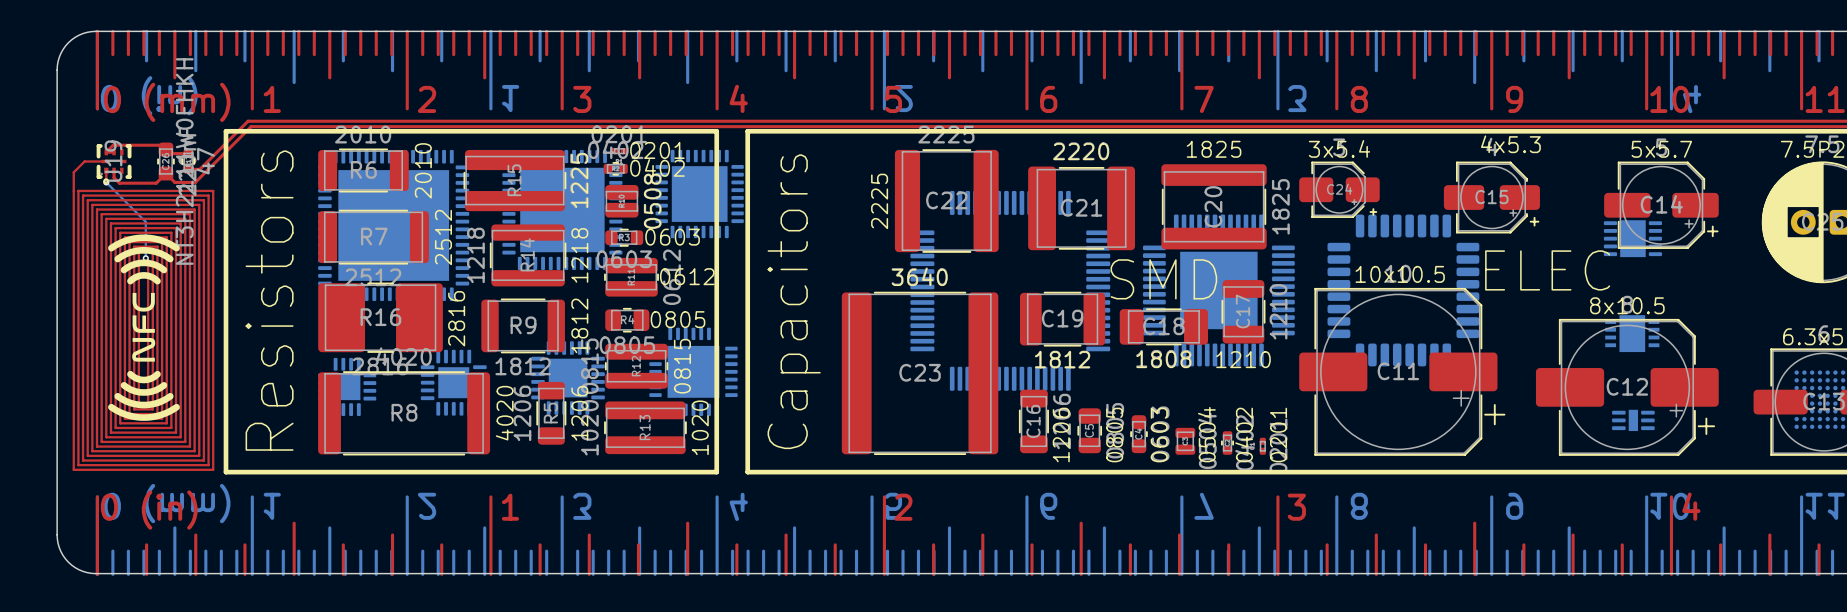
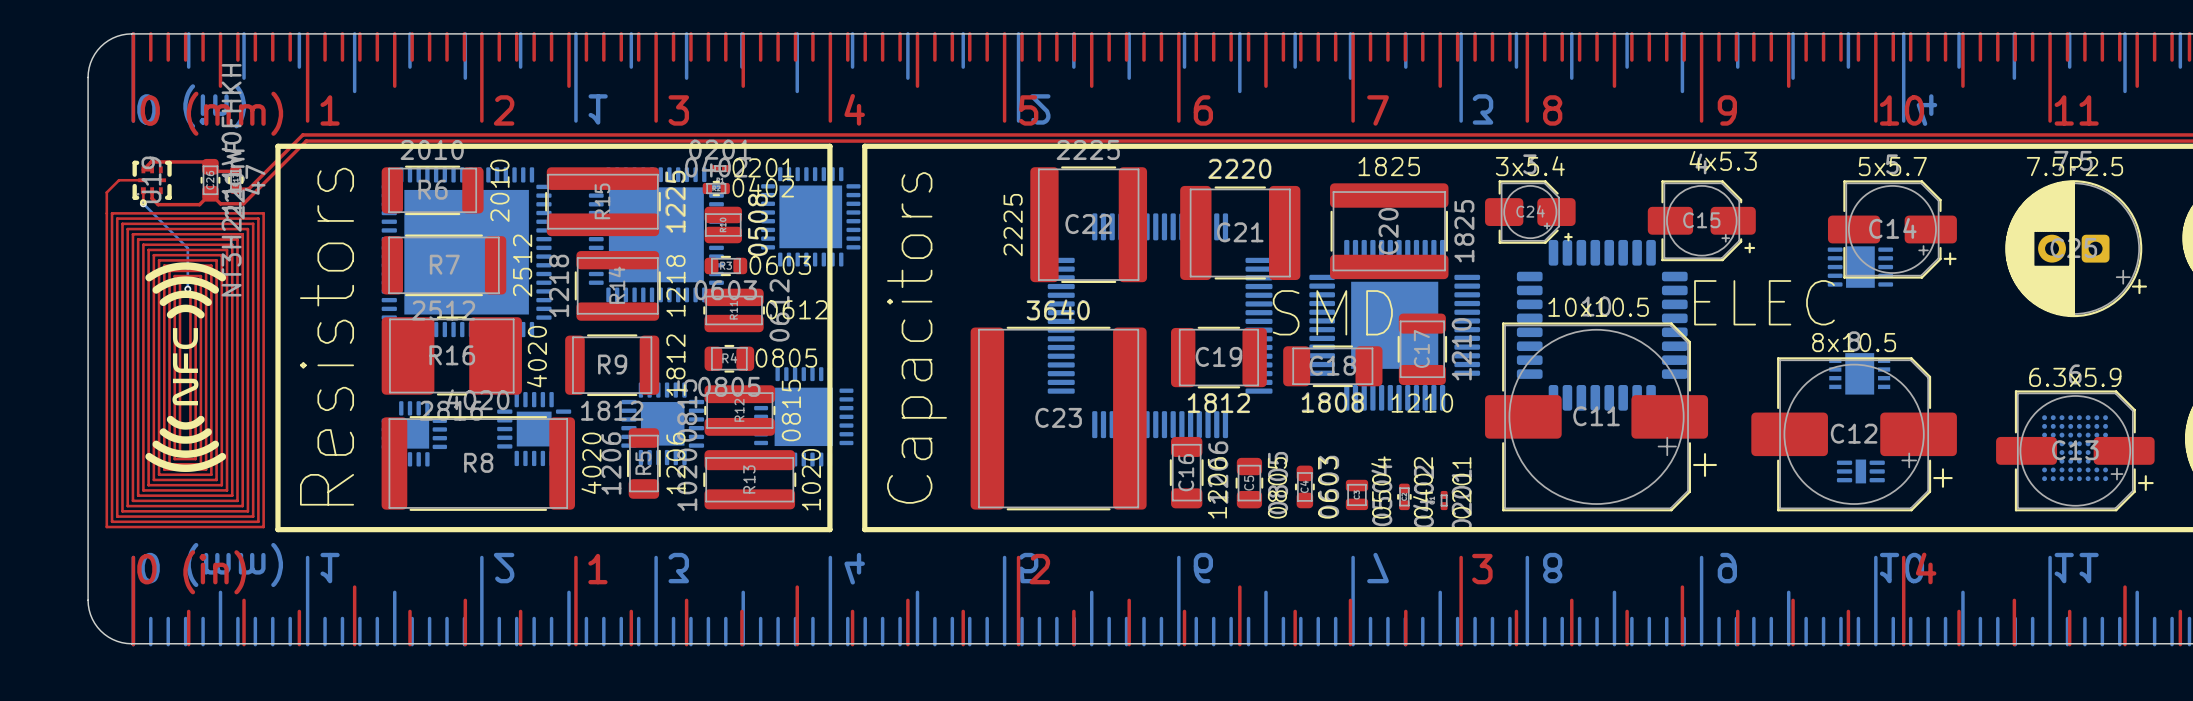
text: 2816 (456, 318) -> 4020 (536, 356)

